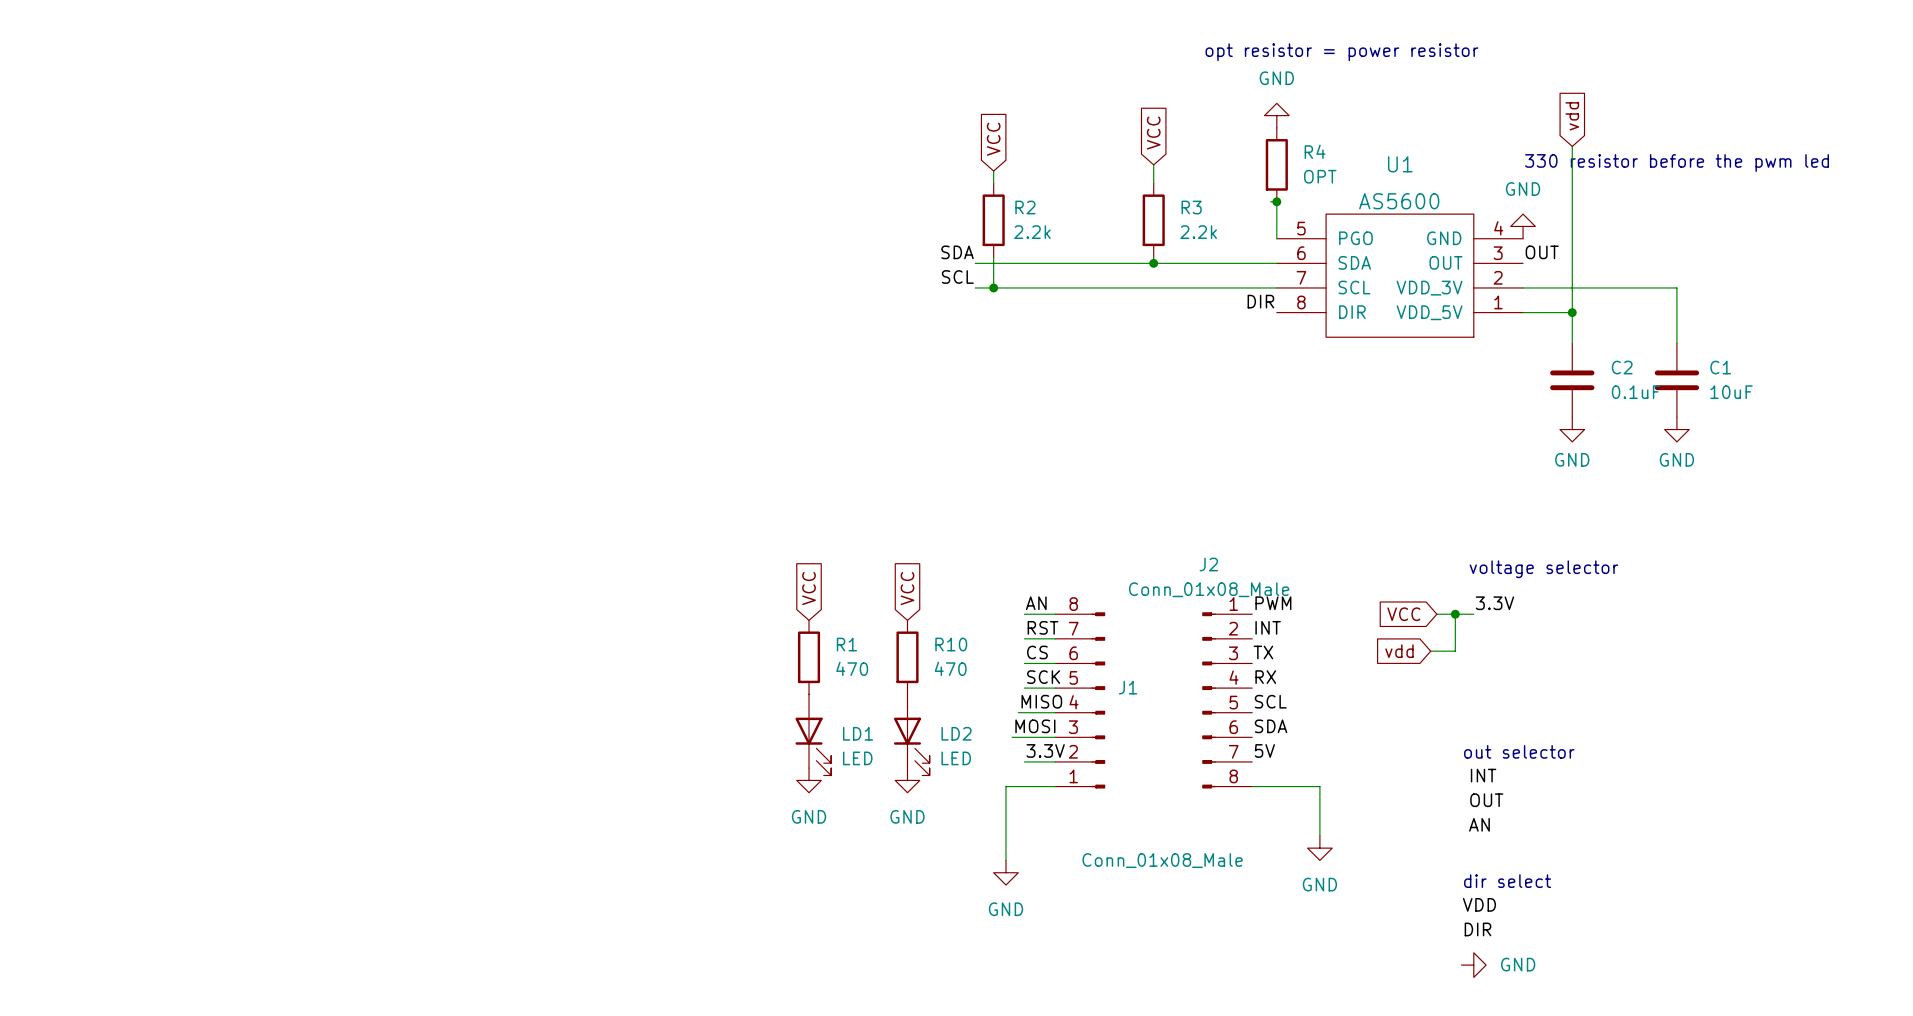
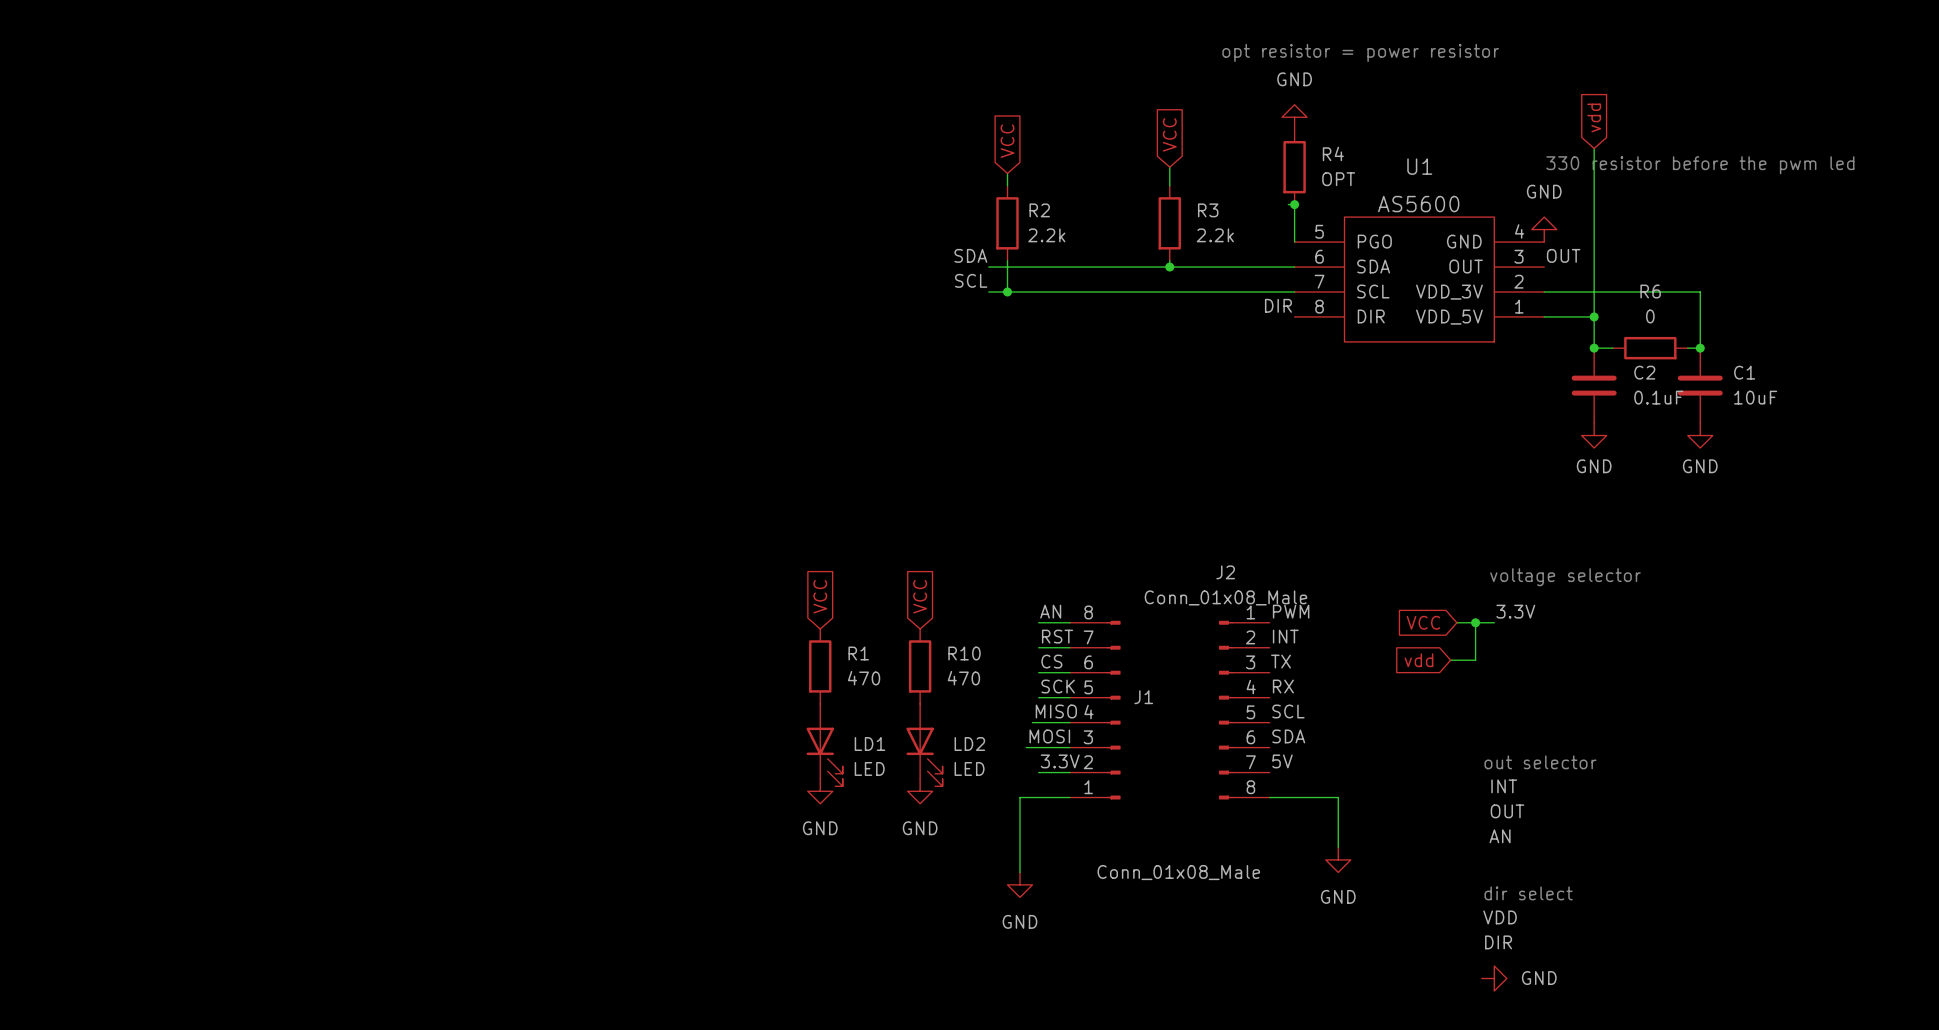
wire: none -> (1594, 348) (1612, 348)
junction: none -> (1594, 348)
R6: none -> 0 (1650, 348)
wire: none -> (1687, 348) (1700, 348)
junction: none -> (1700, 348)

